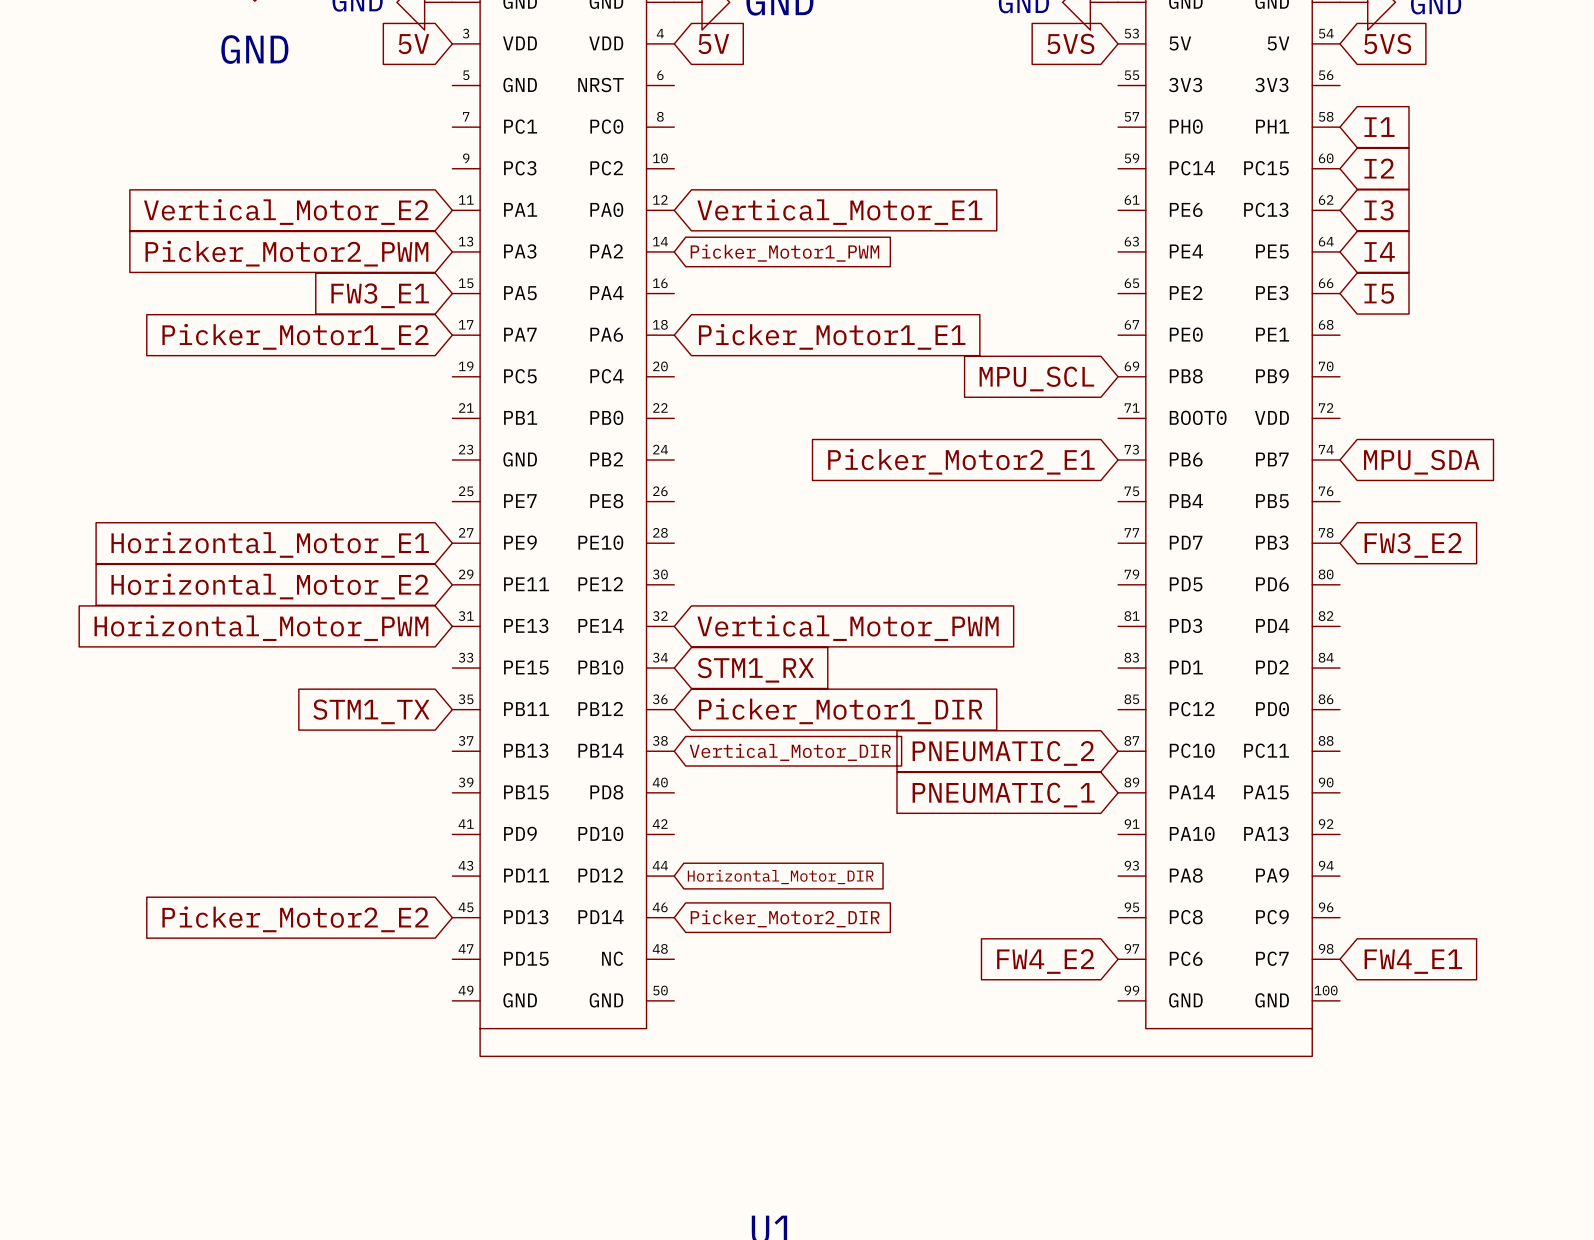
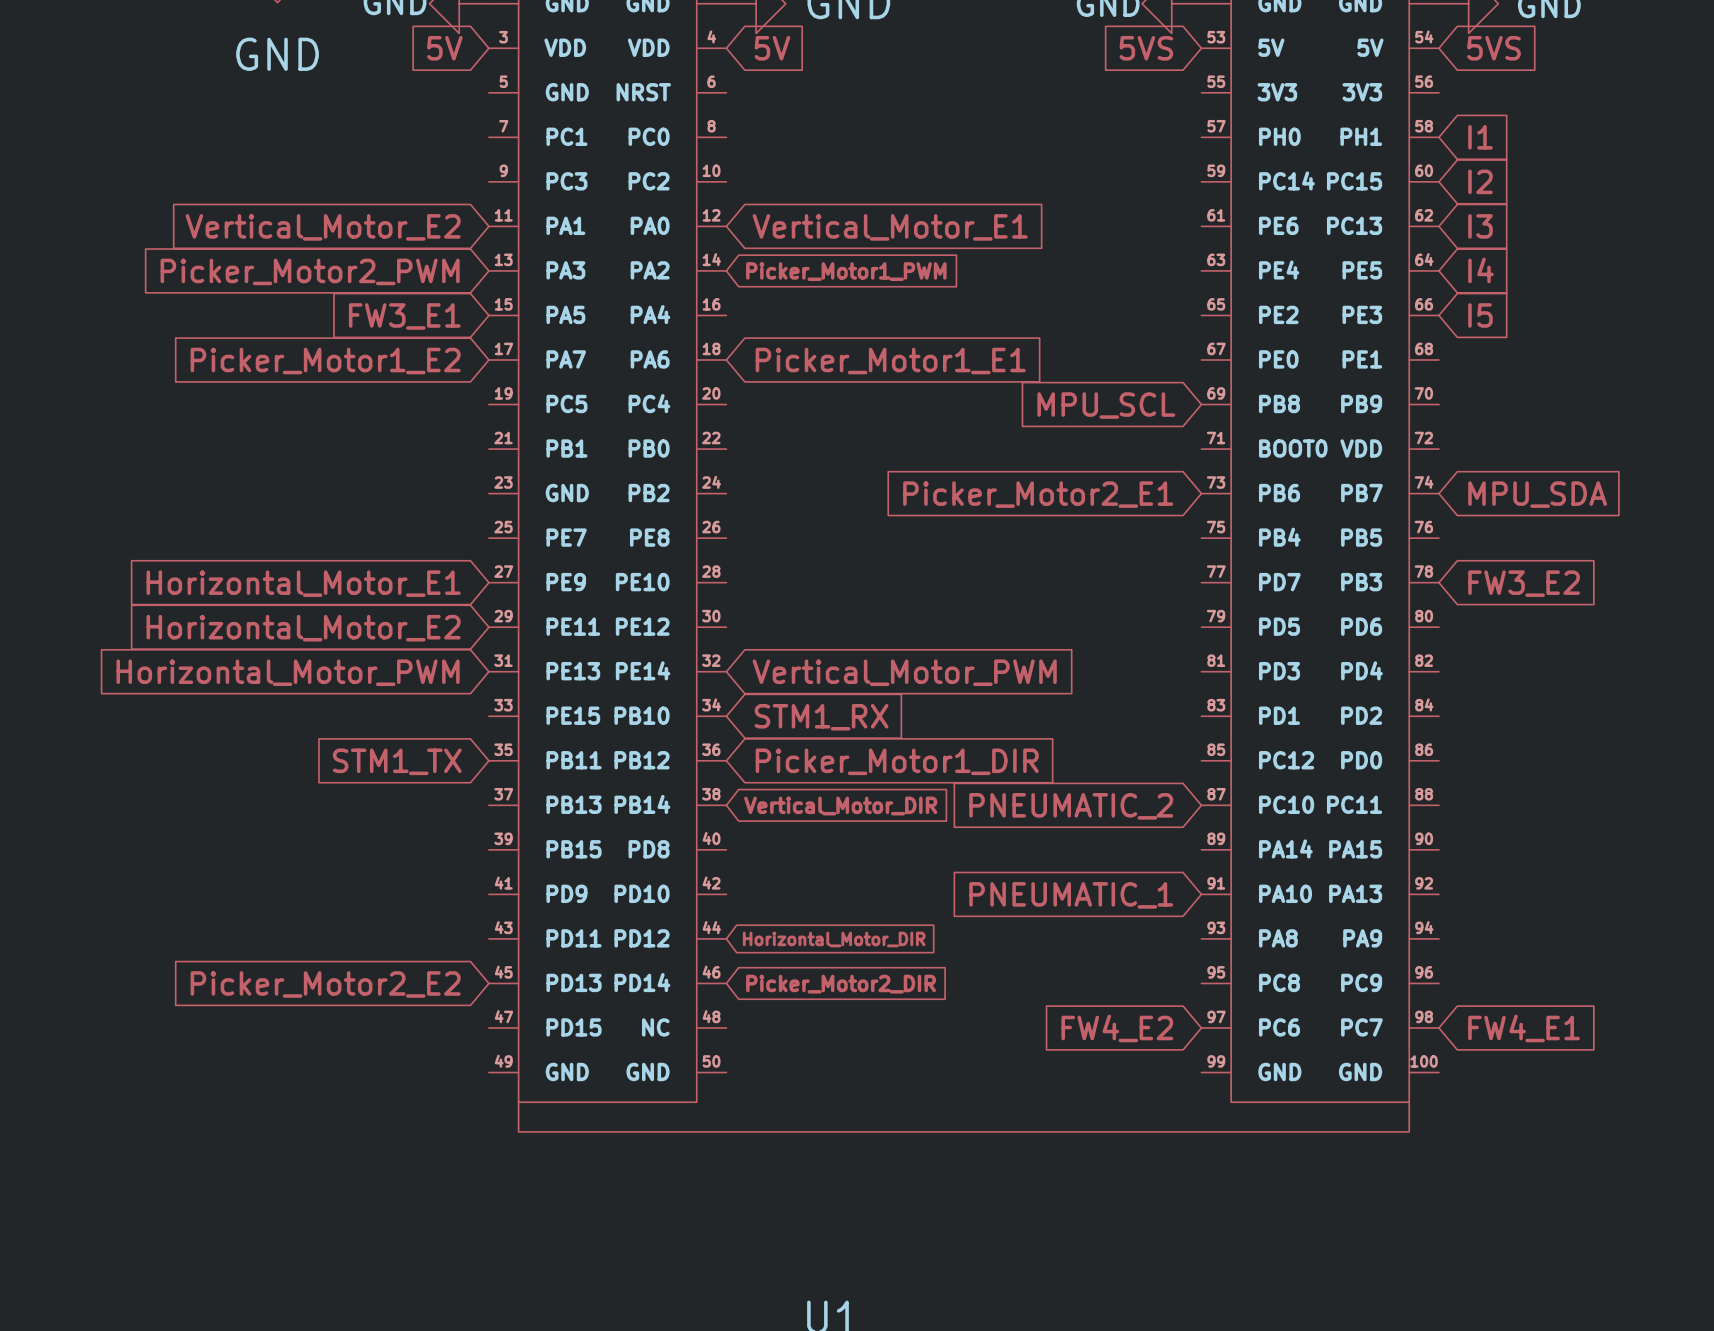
global label position: PNEUMATIC_1 (1003, 795) -> PNEUMATIC_1 (1071, 895)

